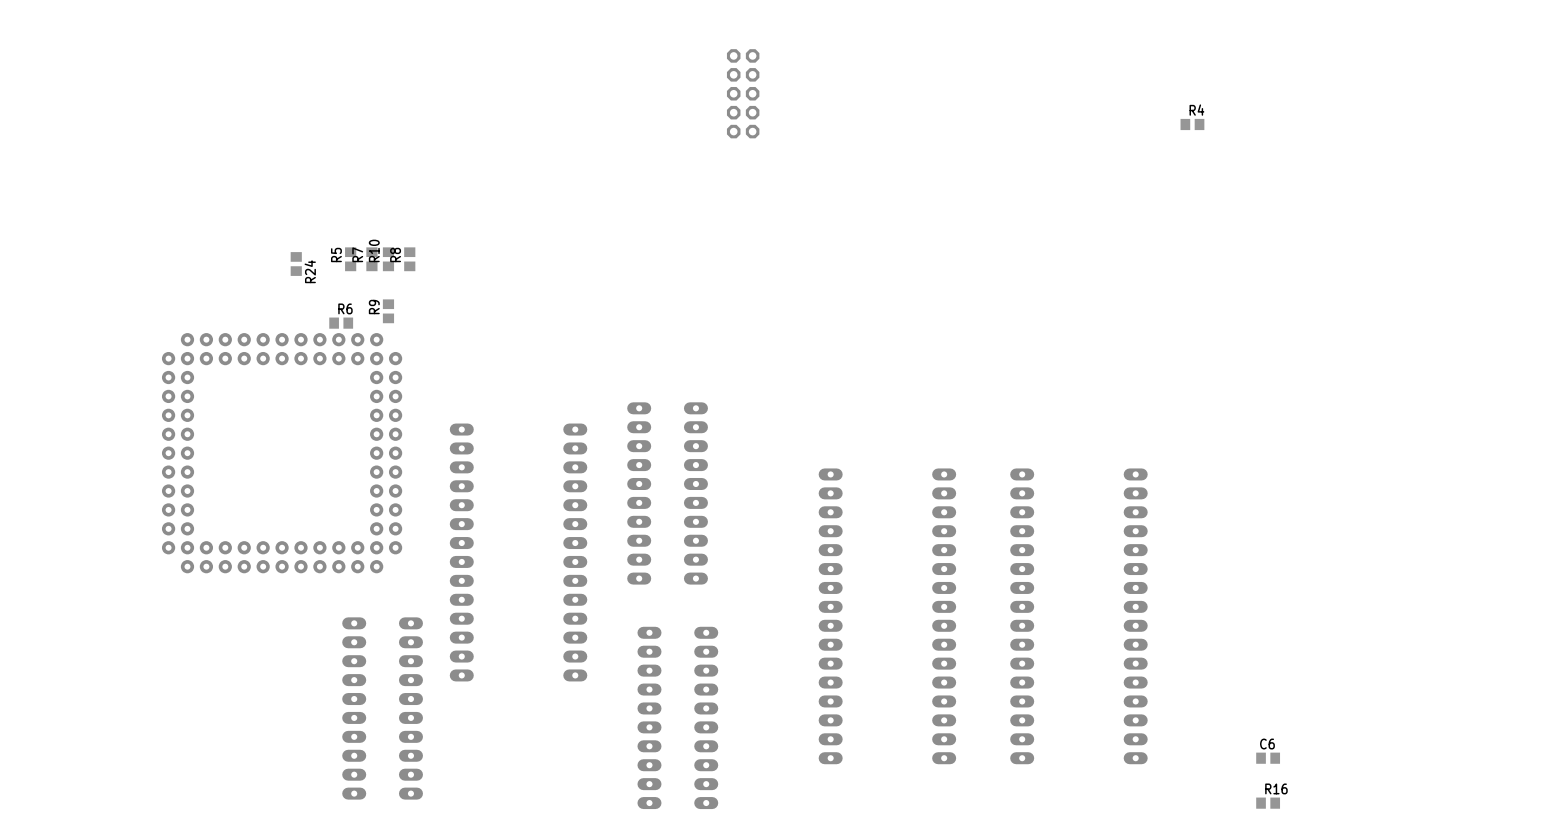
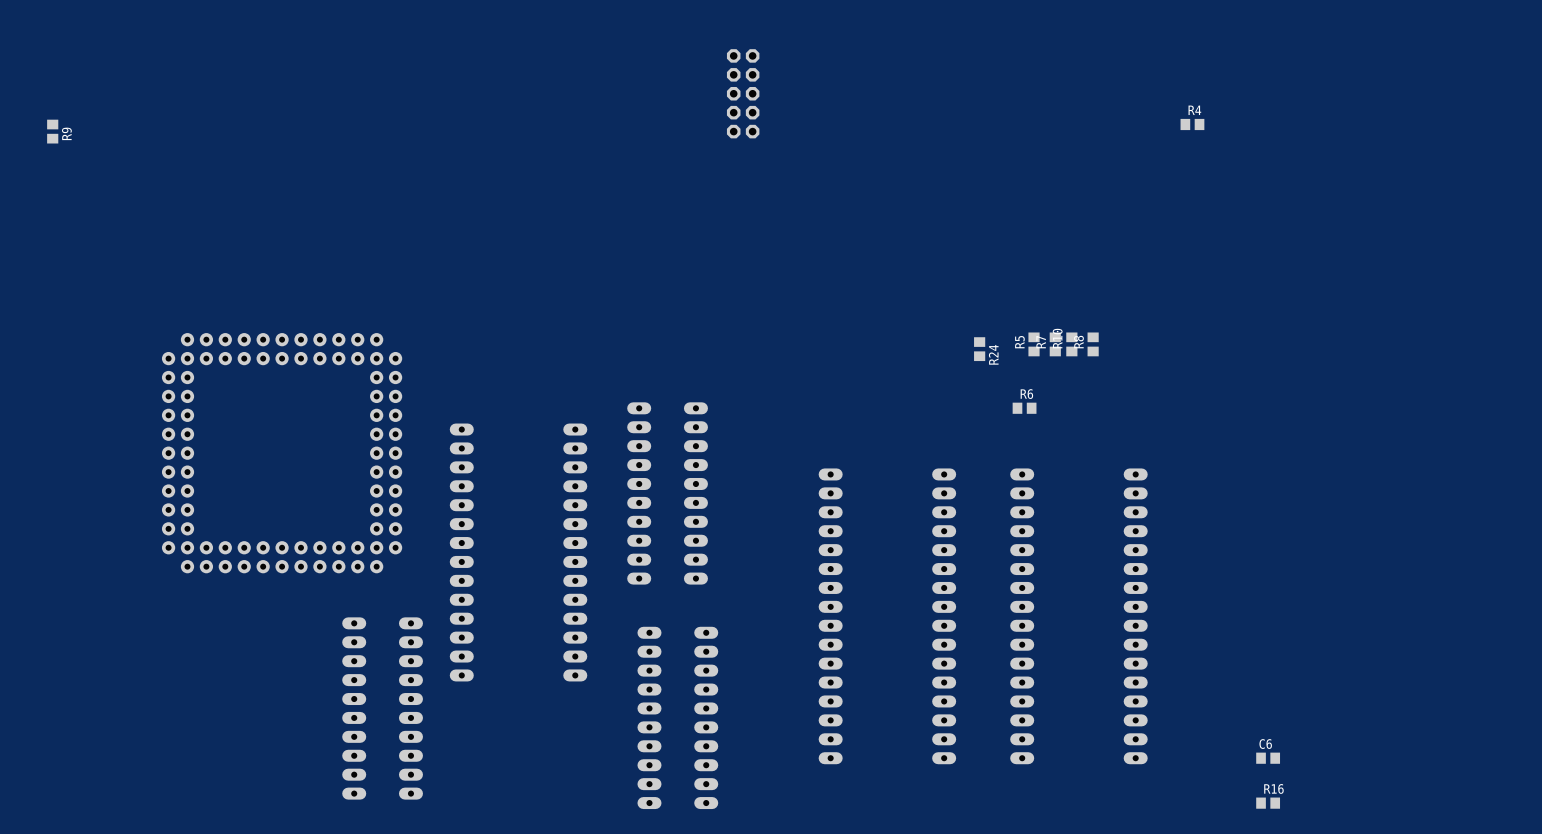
R5 position: (350, 259) -> (1034, 344)
R7 position: (371, 259) -> (1055, 344)
R10 position: (388, 259) -> (1071, 344)
R8 position: (409, 259) -> (1093, 344)
R24 position: (296, 264) -> (979, 349)
R9 name position: R9 (374, 307) -> R9 (66, 133)
R9 position: (388, 311) -> (52, 131)
R6 position: (341, 323) -> (1024, 408)

